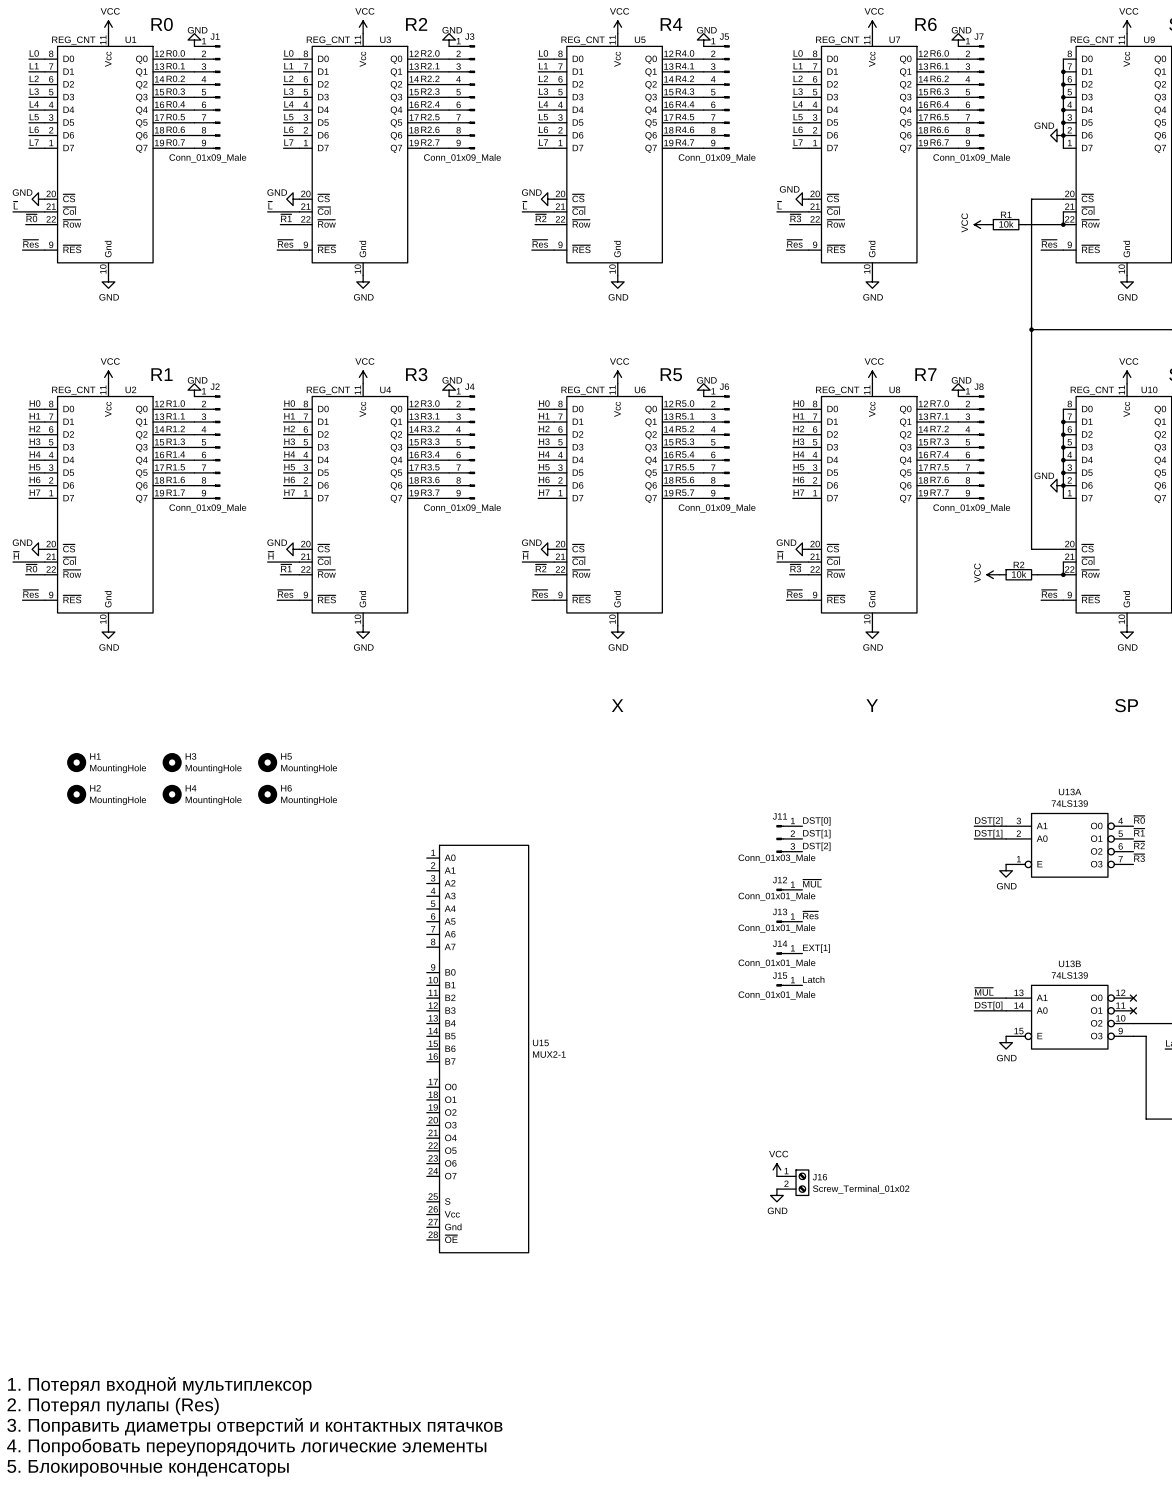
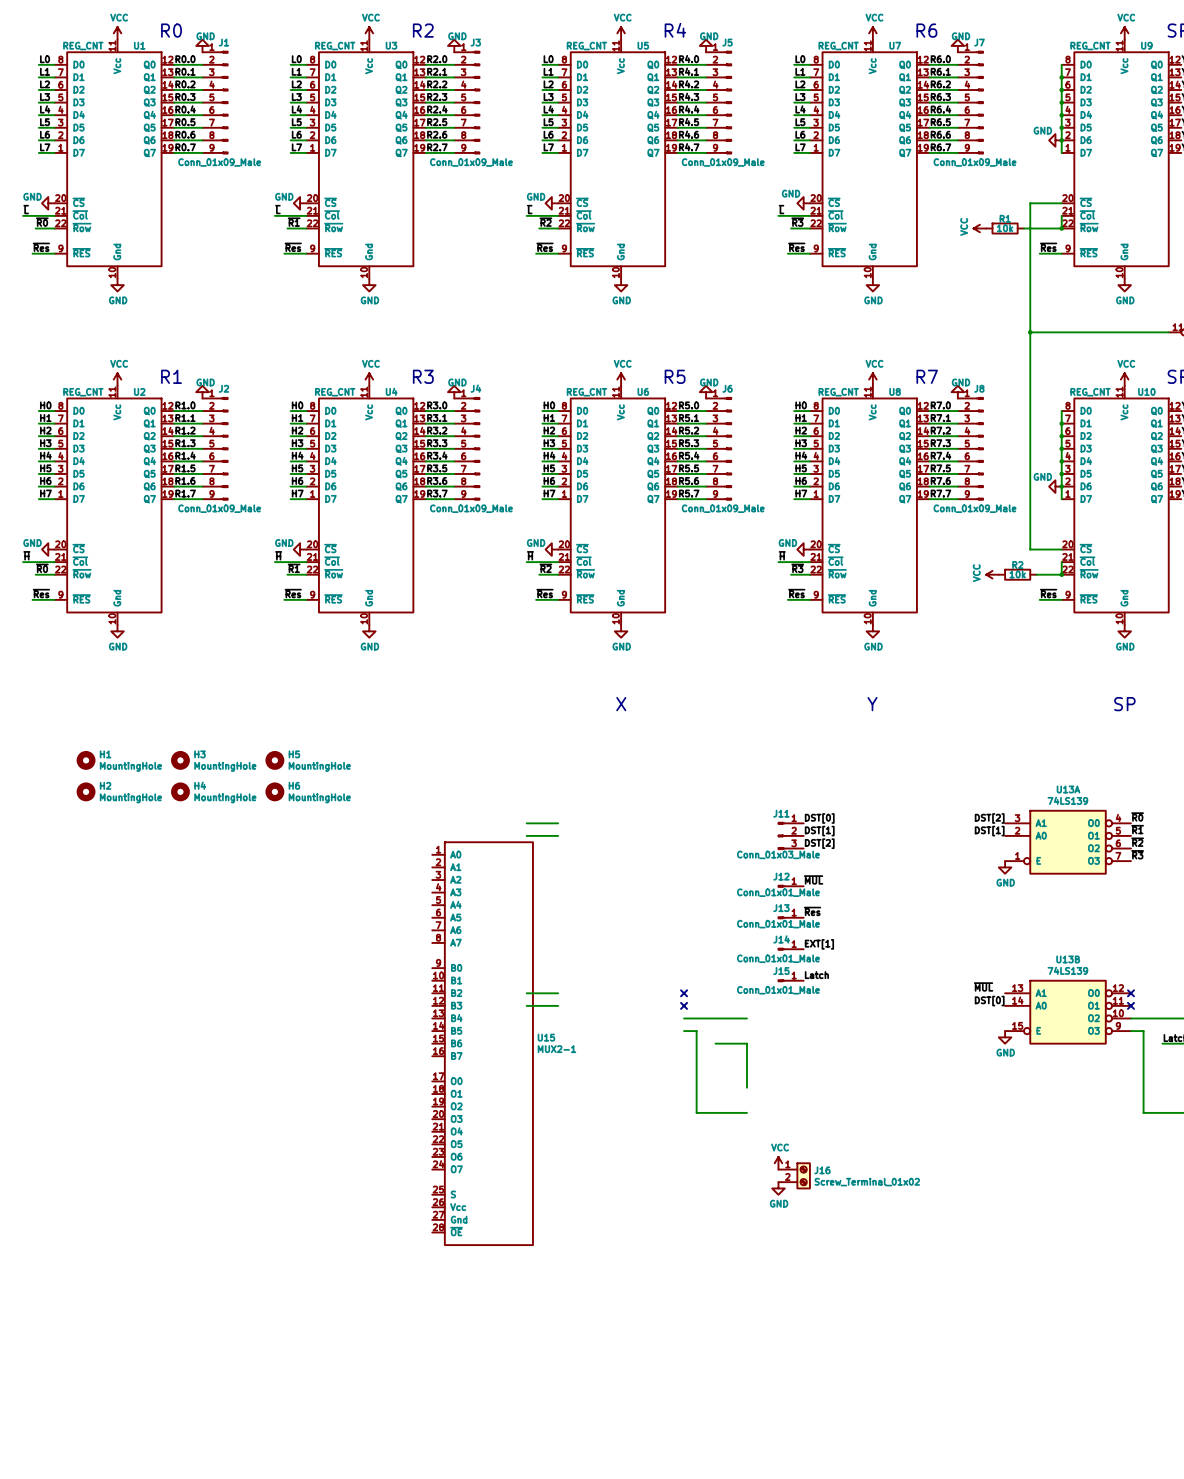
wire: none -> (526, 823) (558, 823)
wire: (974, 826) (1006, 826) -> none
wire: none -> (526, 835) (558, 835)
wire: (974, 838) (1006, 838) -> none
wire: none -> (526, 993) (558, 993)
no-connect mark: none -> (684, 993)
wire: (974, 998) (1006, 998) -> none
wire: none -> (526, 1005) (558, 1005)
no-connect mark: none -> (684, 1005)
wire: (974, 1010) (1006, 1010) -> none
wire: none -> (684, 1018) (746, 1018)
wire: none -> (684, 1031) (696, 1031) (696, 1112) (746, 1112)
wire: none -> (715, 1043) (746, 1043) (746, 1087)
text: 1. Потерял входной мультиплексор (159, 1385) -> none
text: 2. Потерял пулапы (Res) (113, 1406) -> none
text: 3. Поправить диаметры отверстий и контактных пятачков (254, 1426) -> none
text: 4. Попробовать переупорядочить логические элементы (246, 1447) -> none
text: 5. Блокировочные конденсаторы (148, 1468) -> none

